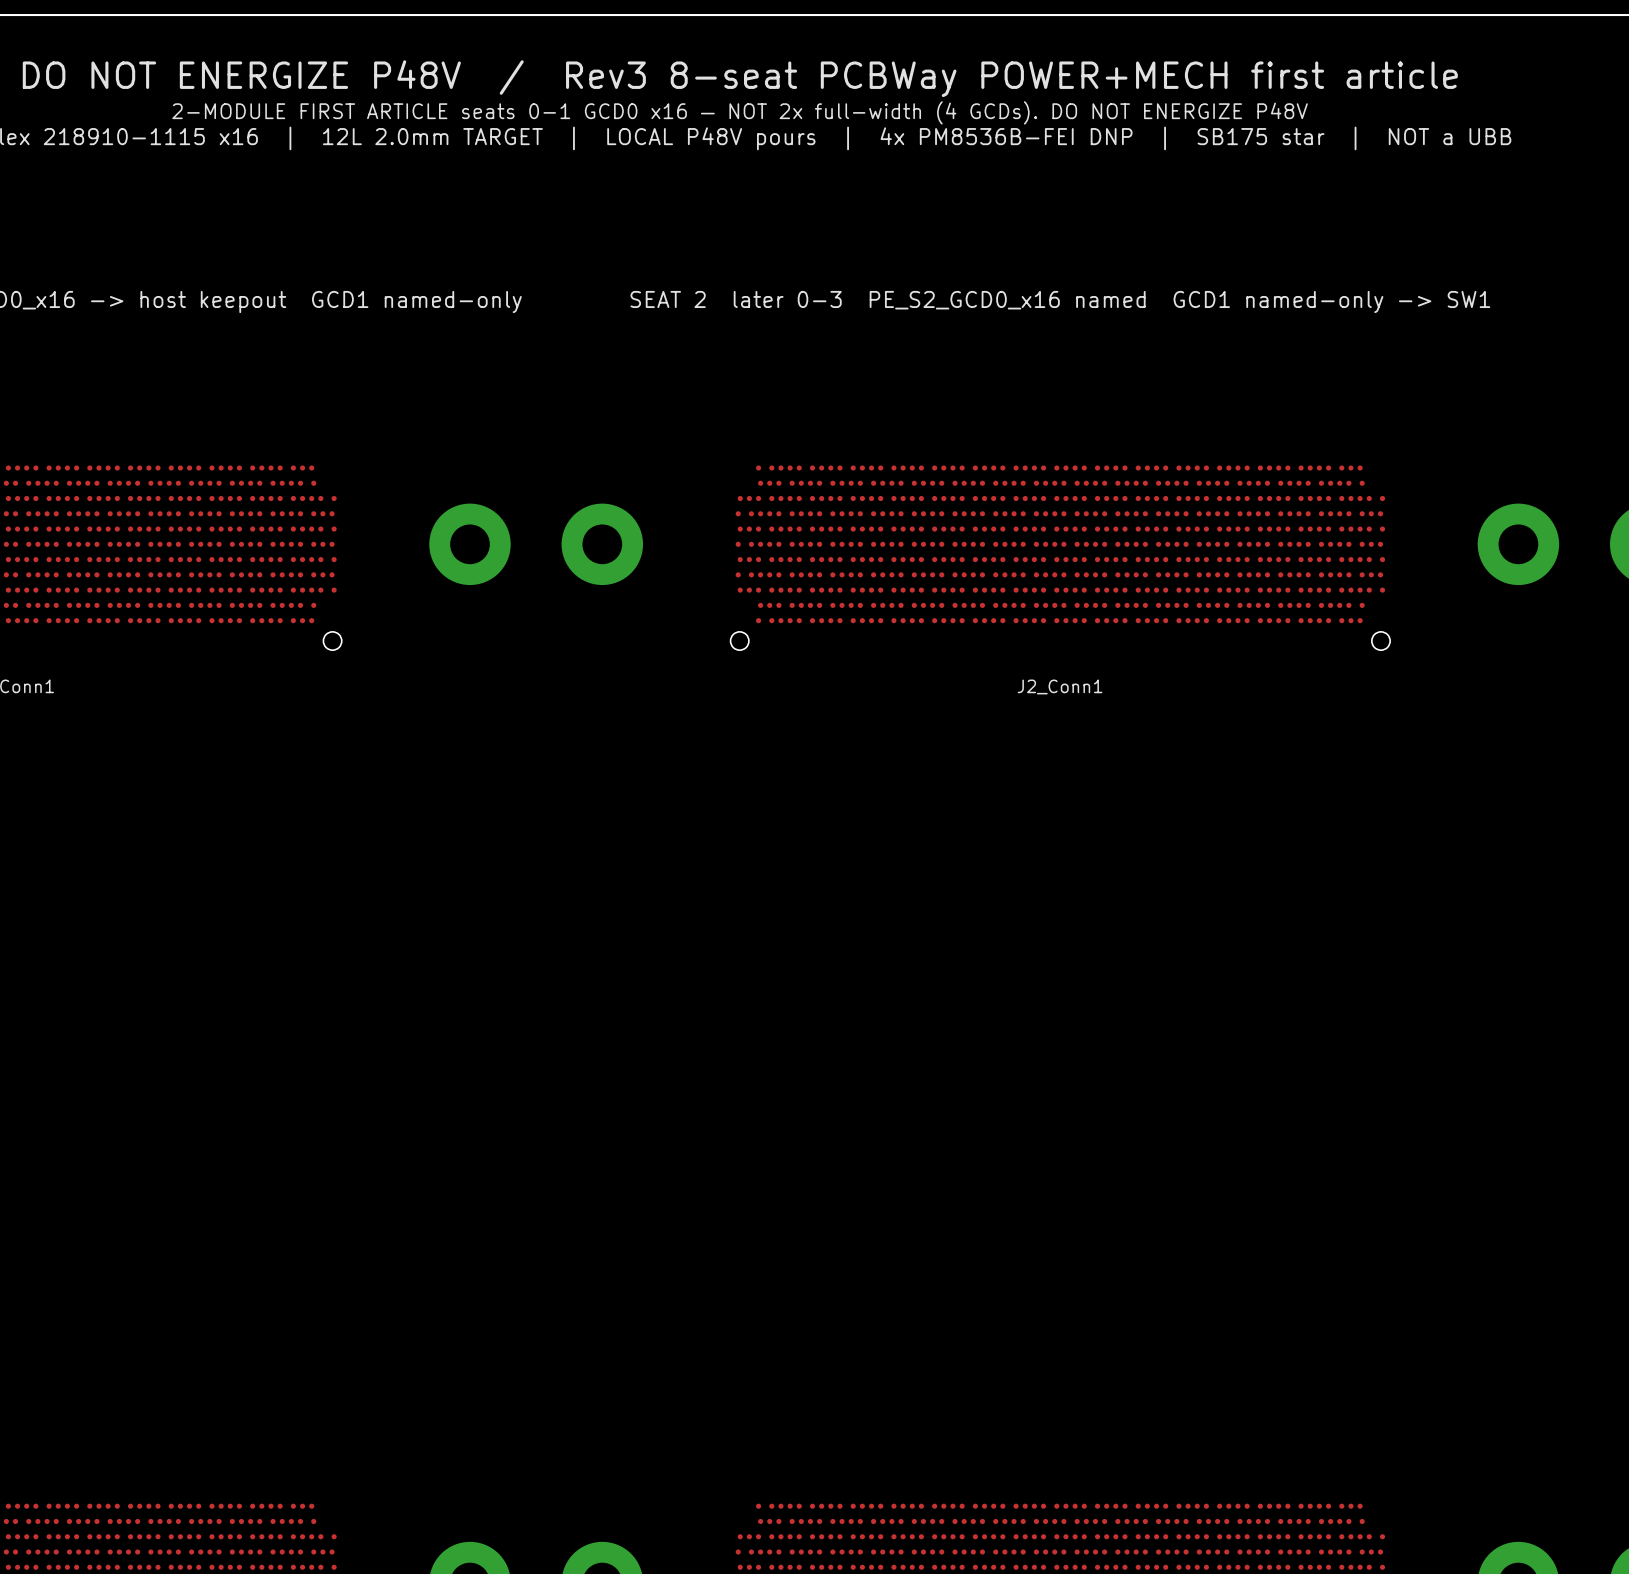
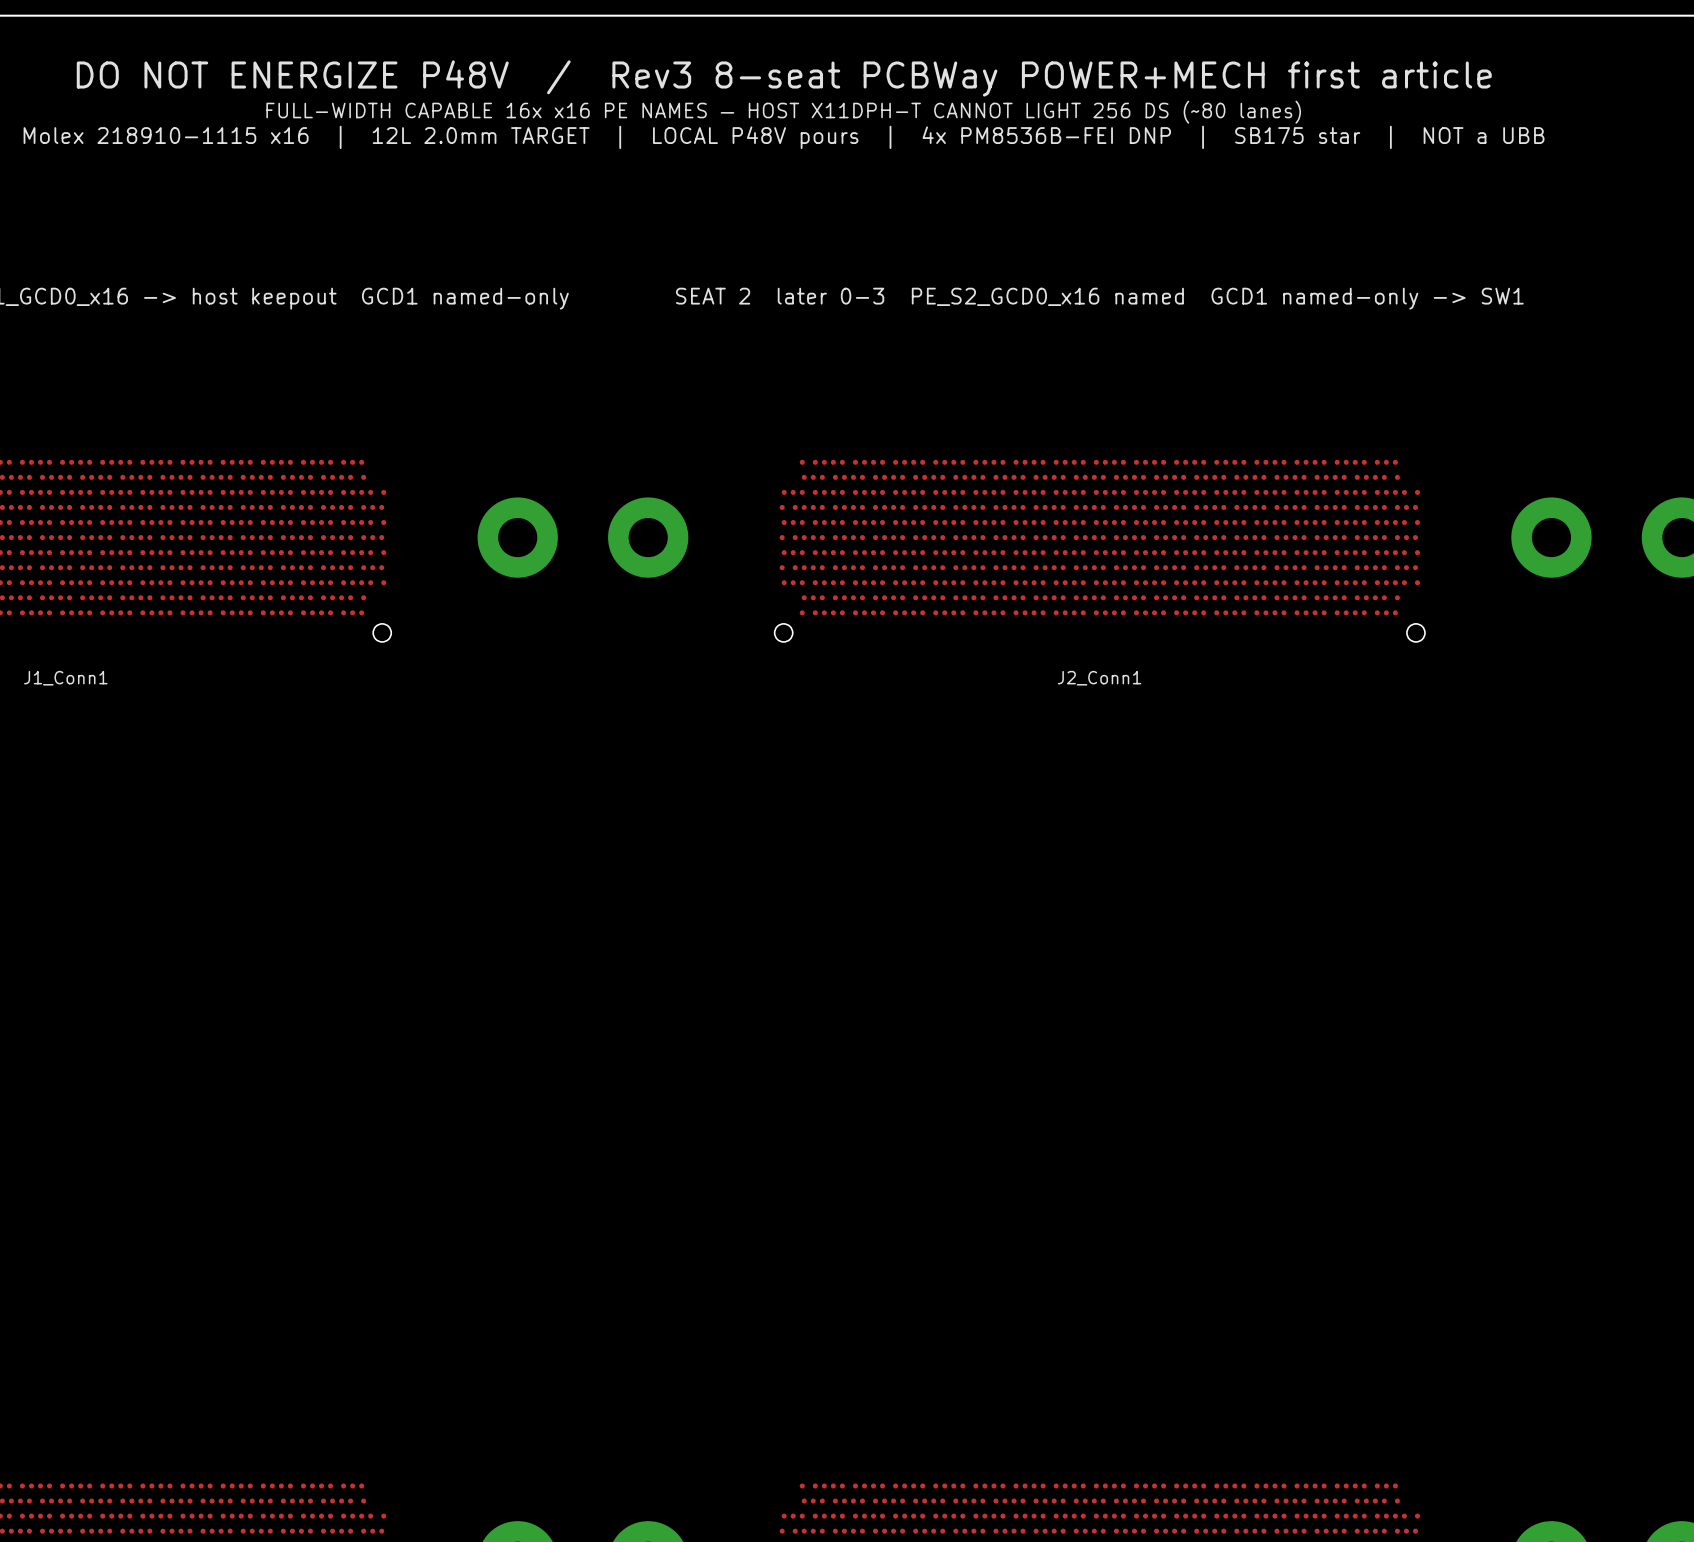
text: 2-MODULE FIRST ARTICLE seats 0-1 GCD0 x16 — NOT 2x full-width (4 GCDs). DO NOT ENERGIZE P48V (740, 112) -> FULL-WIDTH CAPABLE 16x x16 PE NAMES — HOST X11DPH-T CANNOT LIGHT 256 DS (~80 lanes) (783, 112)

